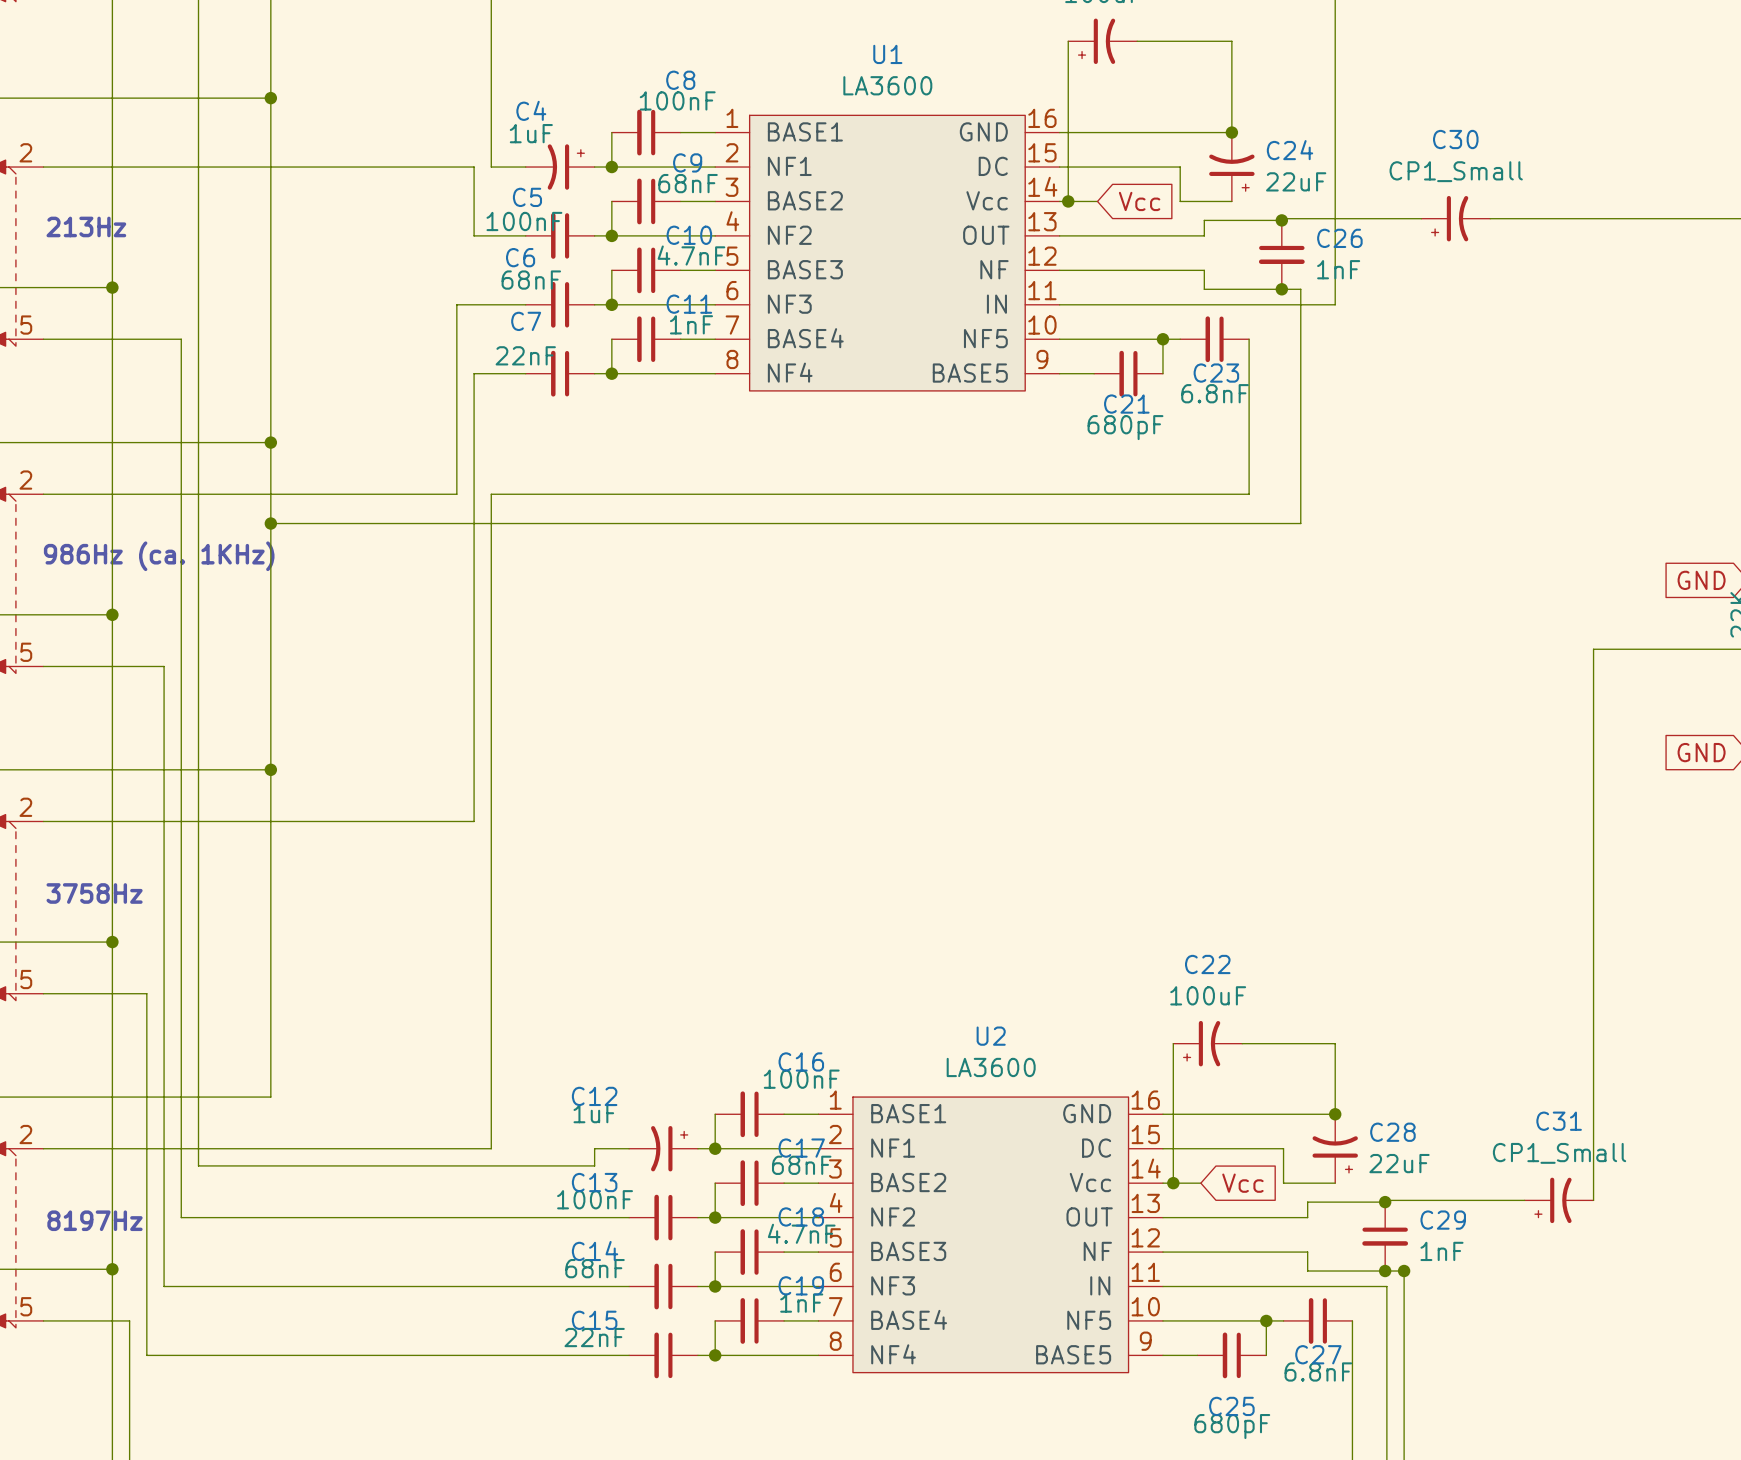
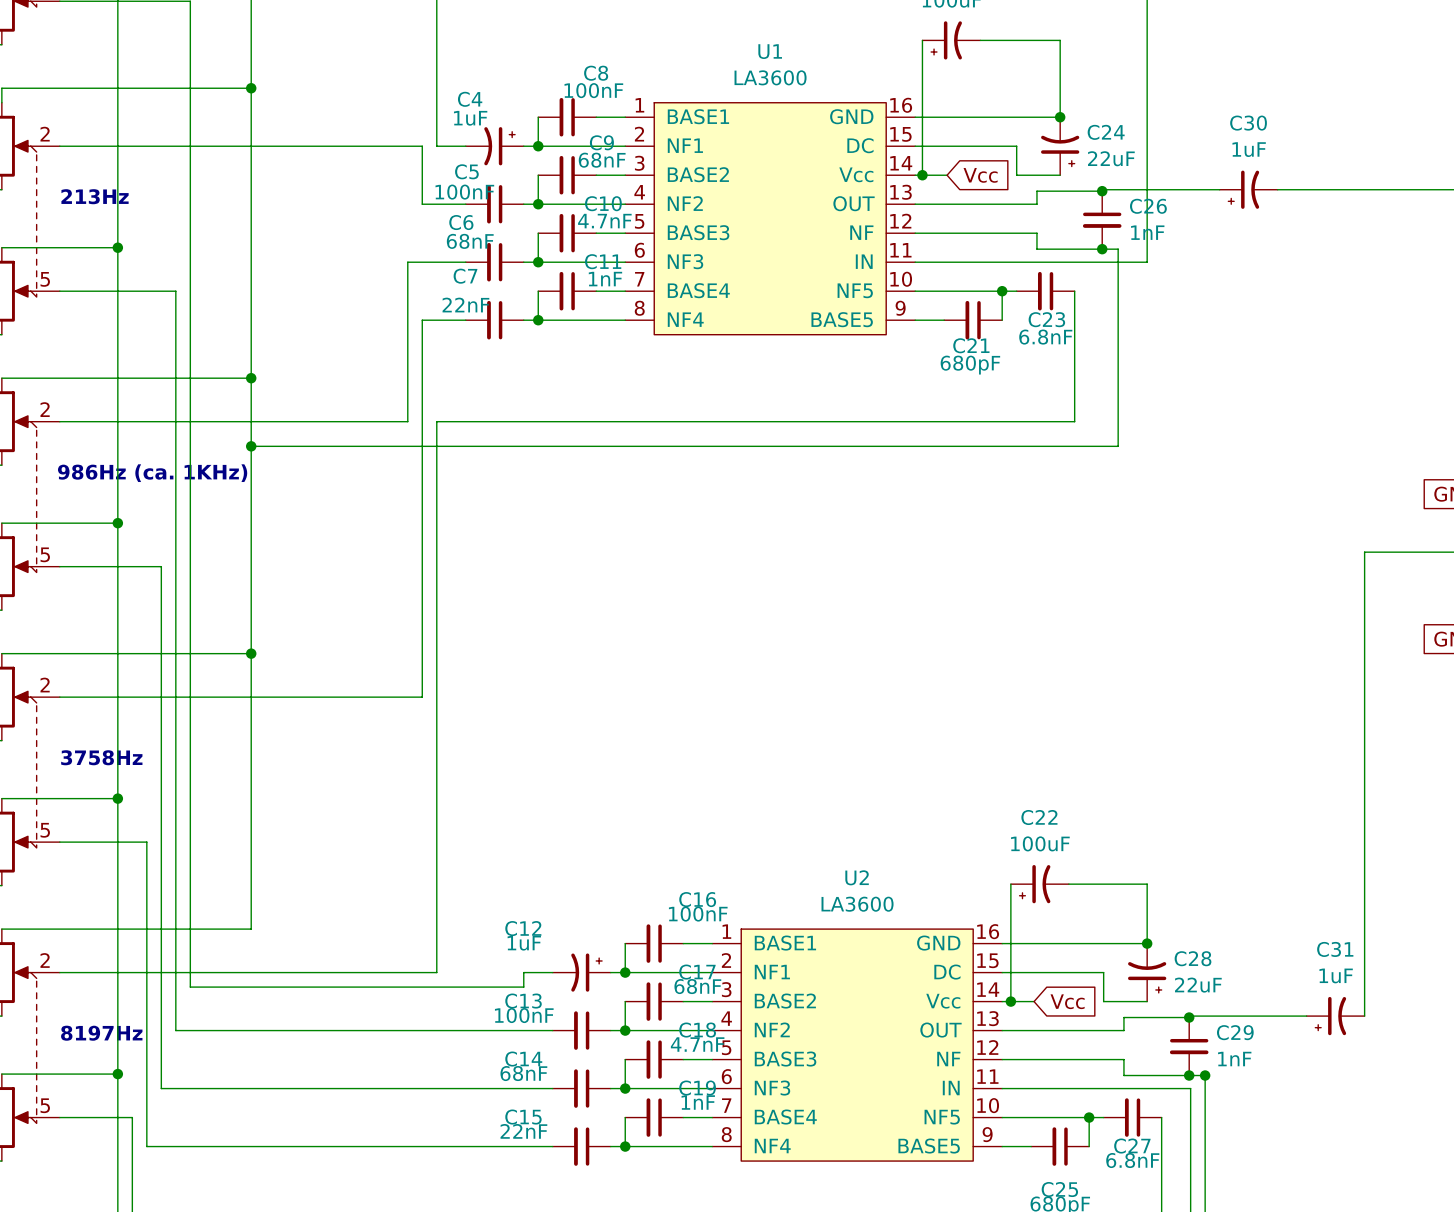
C30 value: CP1_Small (1456, 171) -> 1uF (1249, 149)
C31 value: CP1_Small (1559, 1153) -> 1uF (1336, 975)

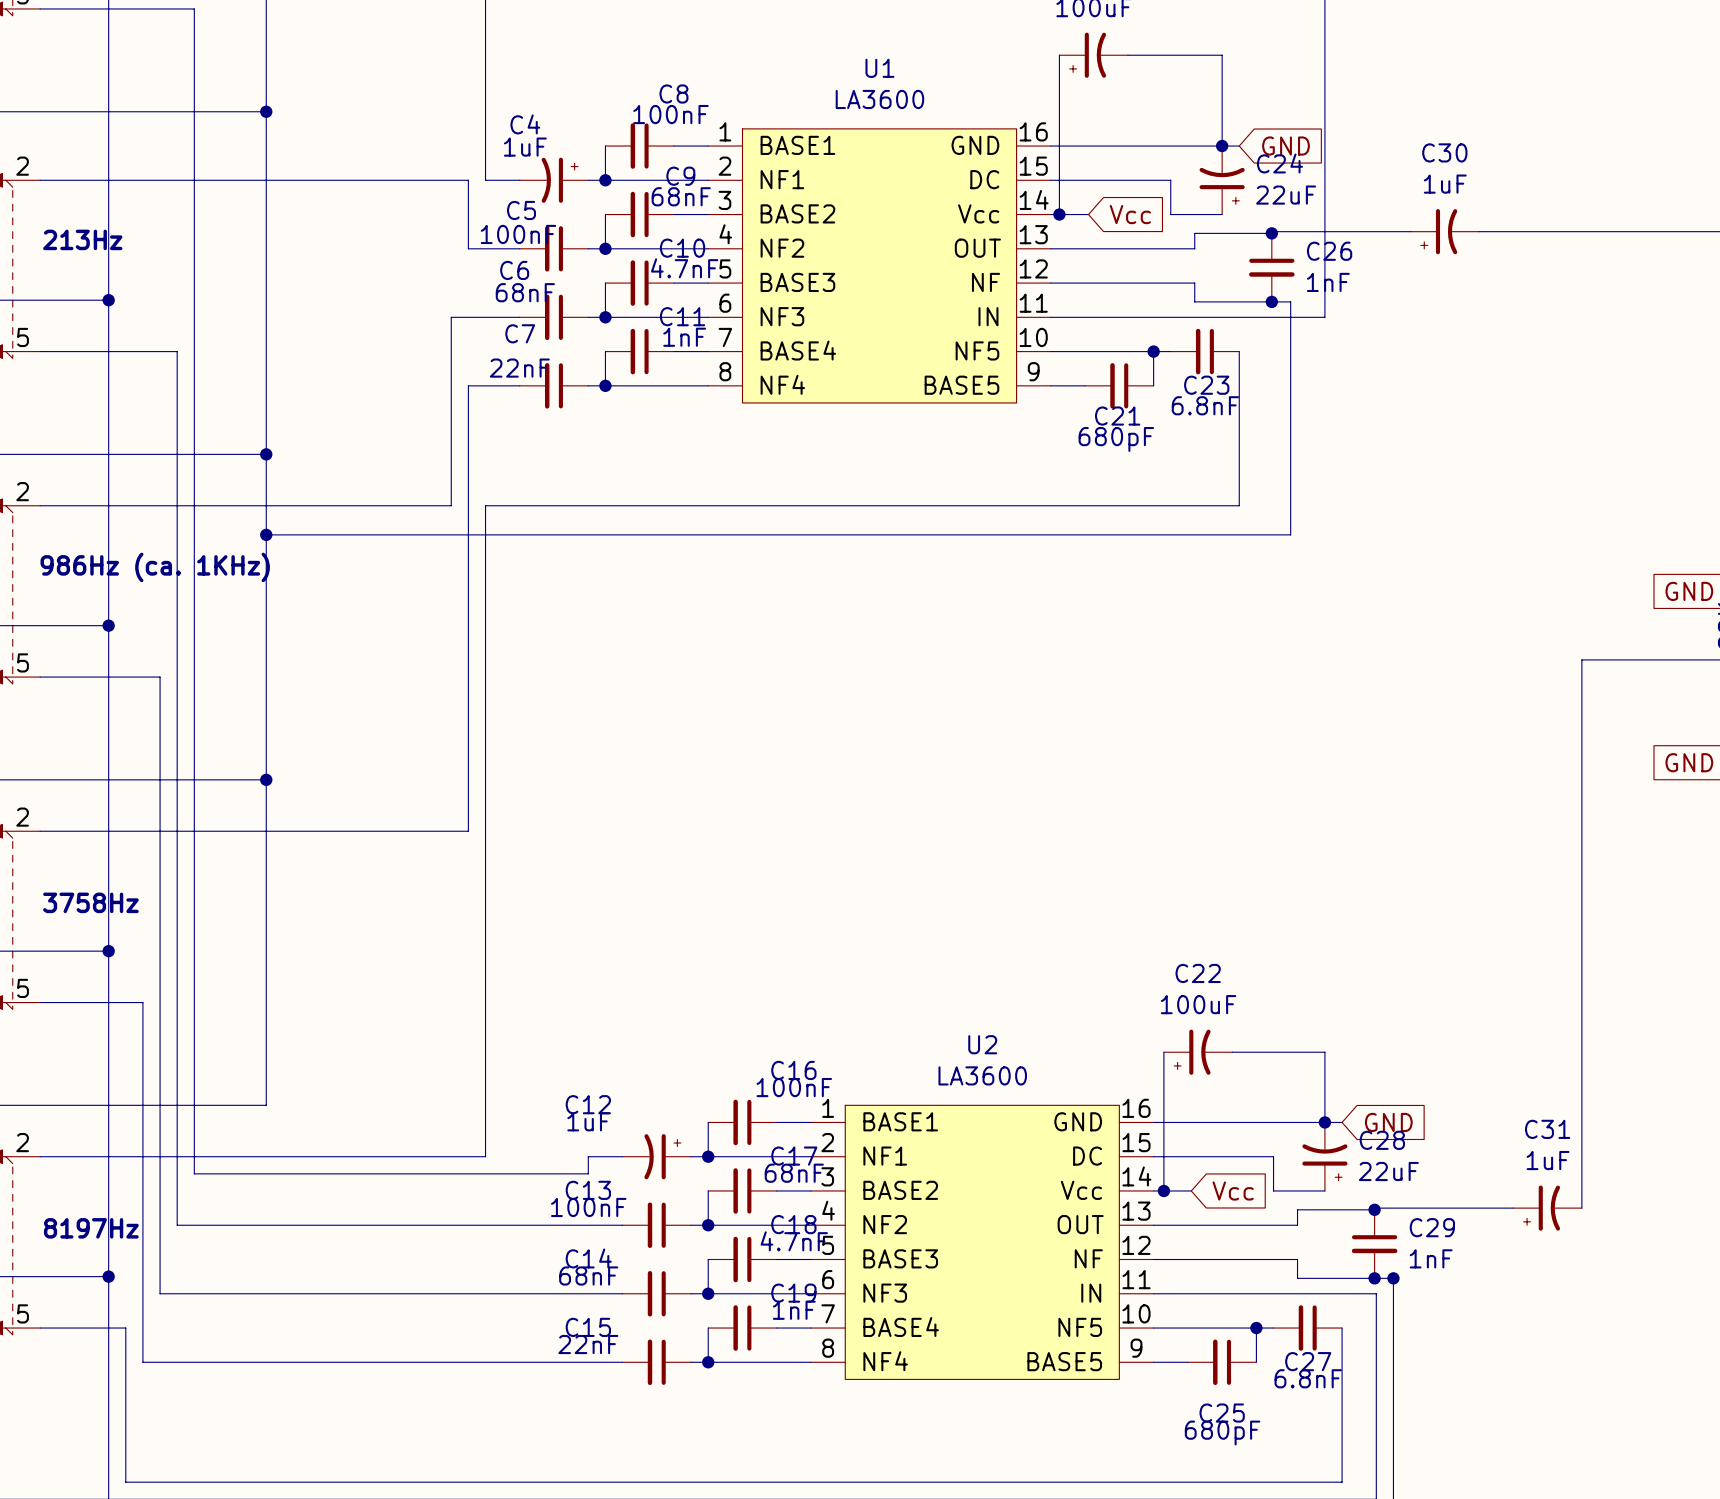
wire: none -> (1222, 146) (1239, 146)
global label: none -> GND (1286, 146)
wire: none -> (1324, 1122) (1342, 1122)
global label: none -> GND (1388, 1122)

